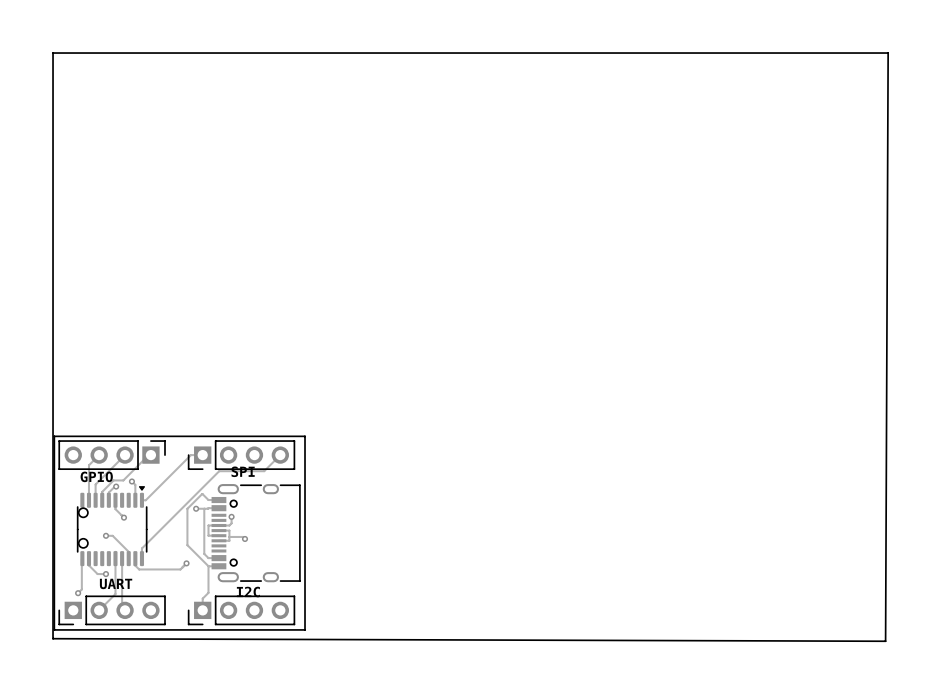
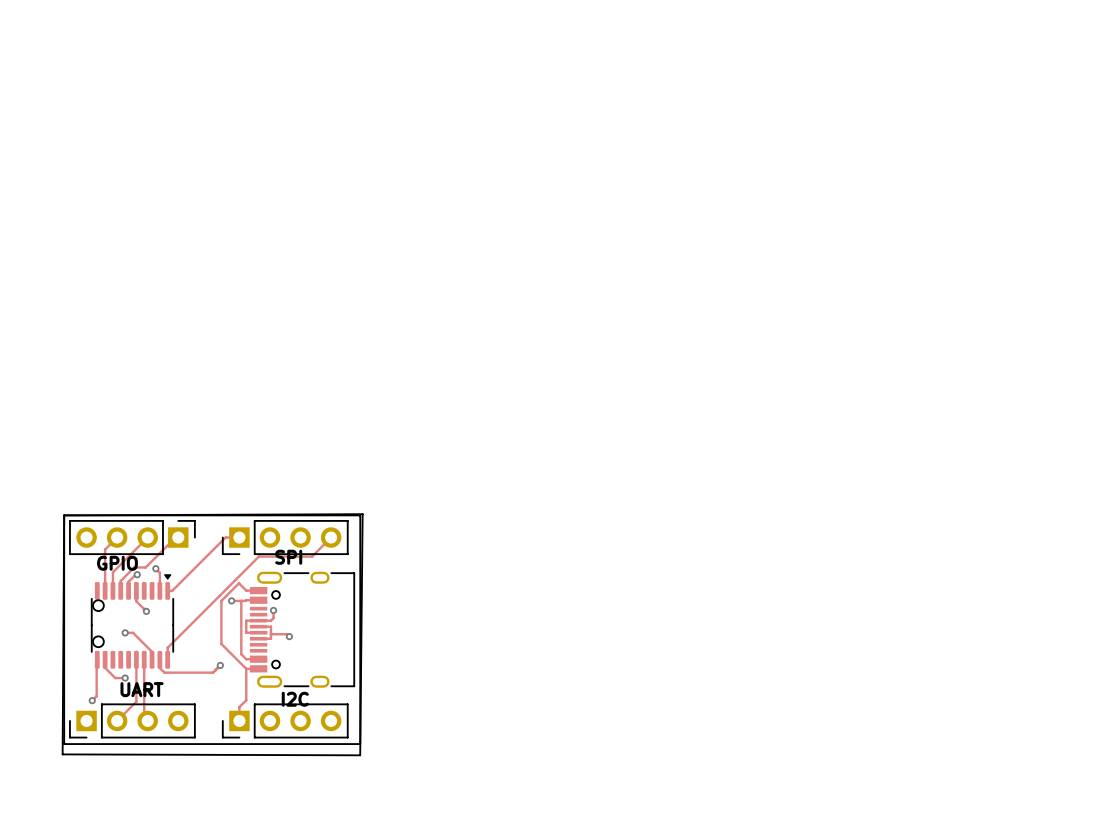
board edge: (53, 638) (53, 53) (888, 53) (885, 641) (304, 639) -> (62, 754) (64, 515) (362, 514) (360, 755)

